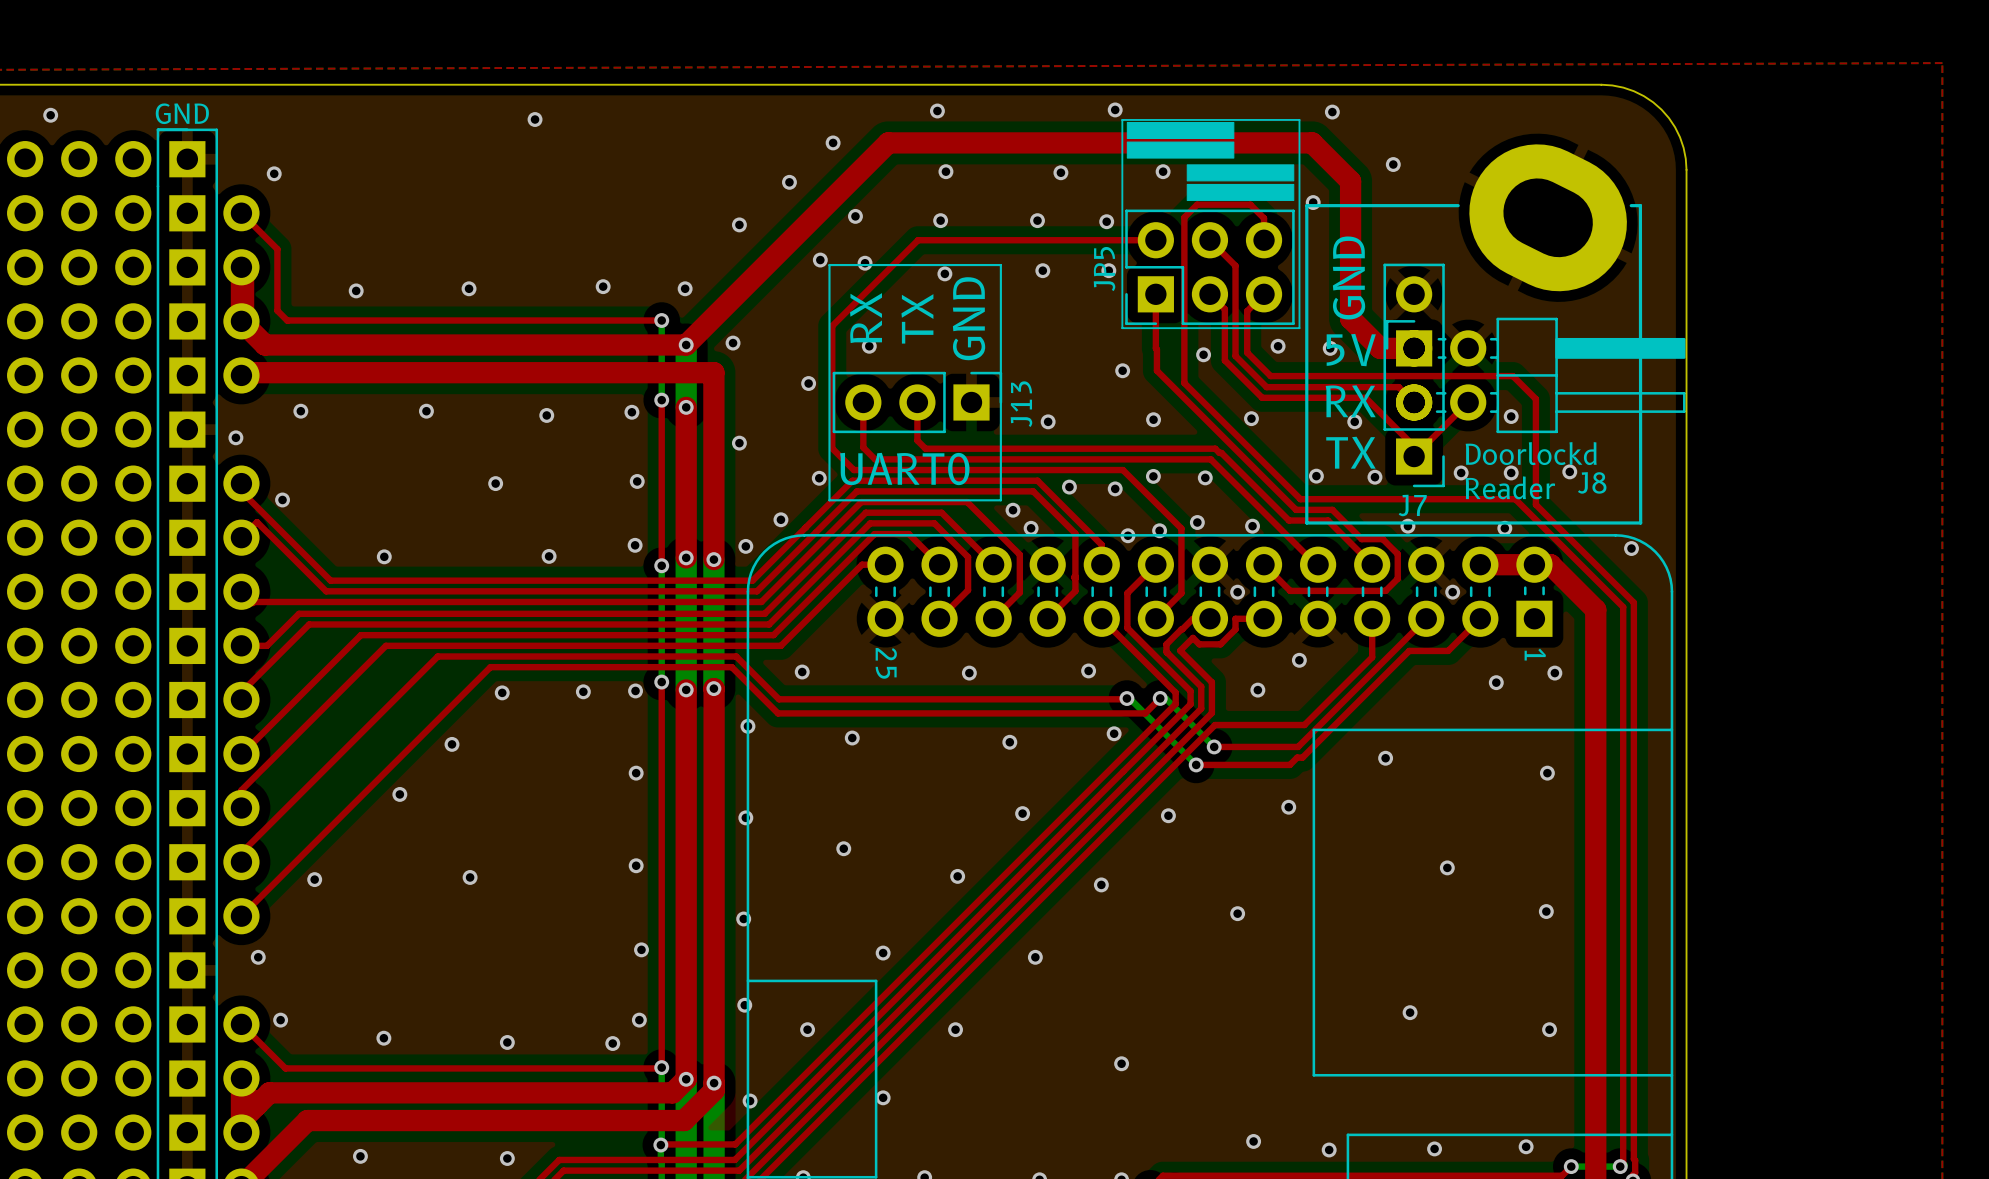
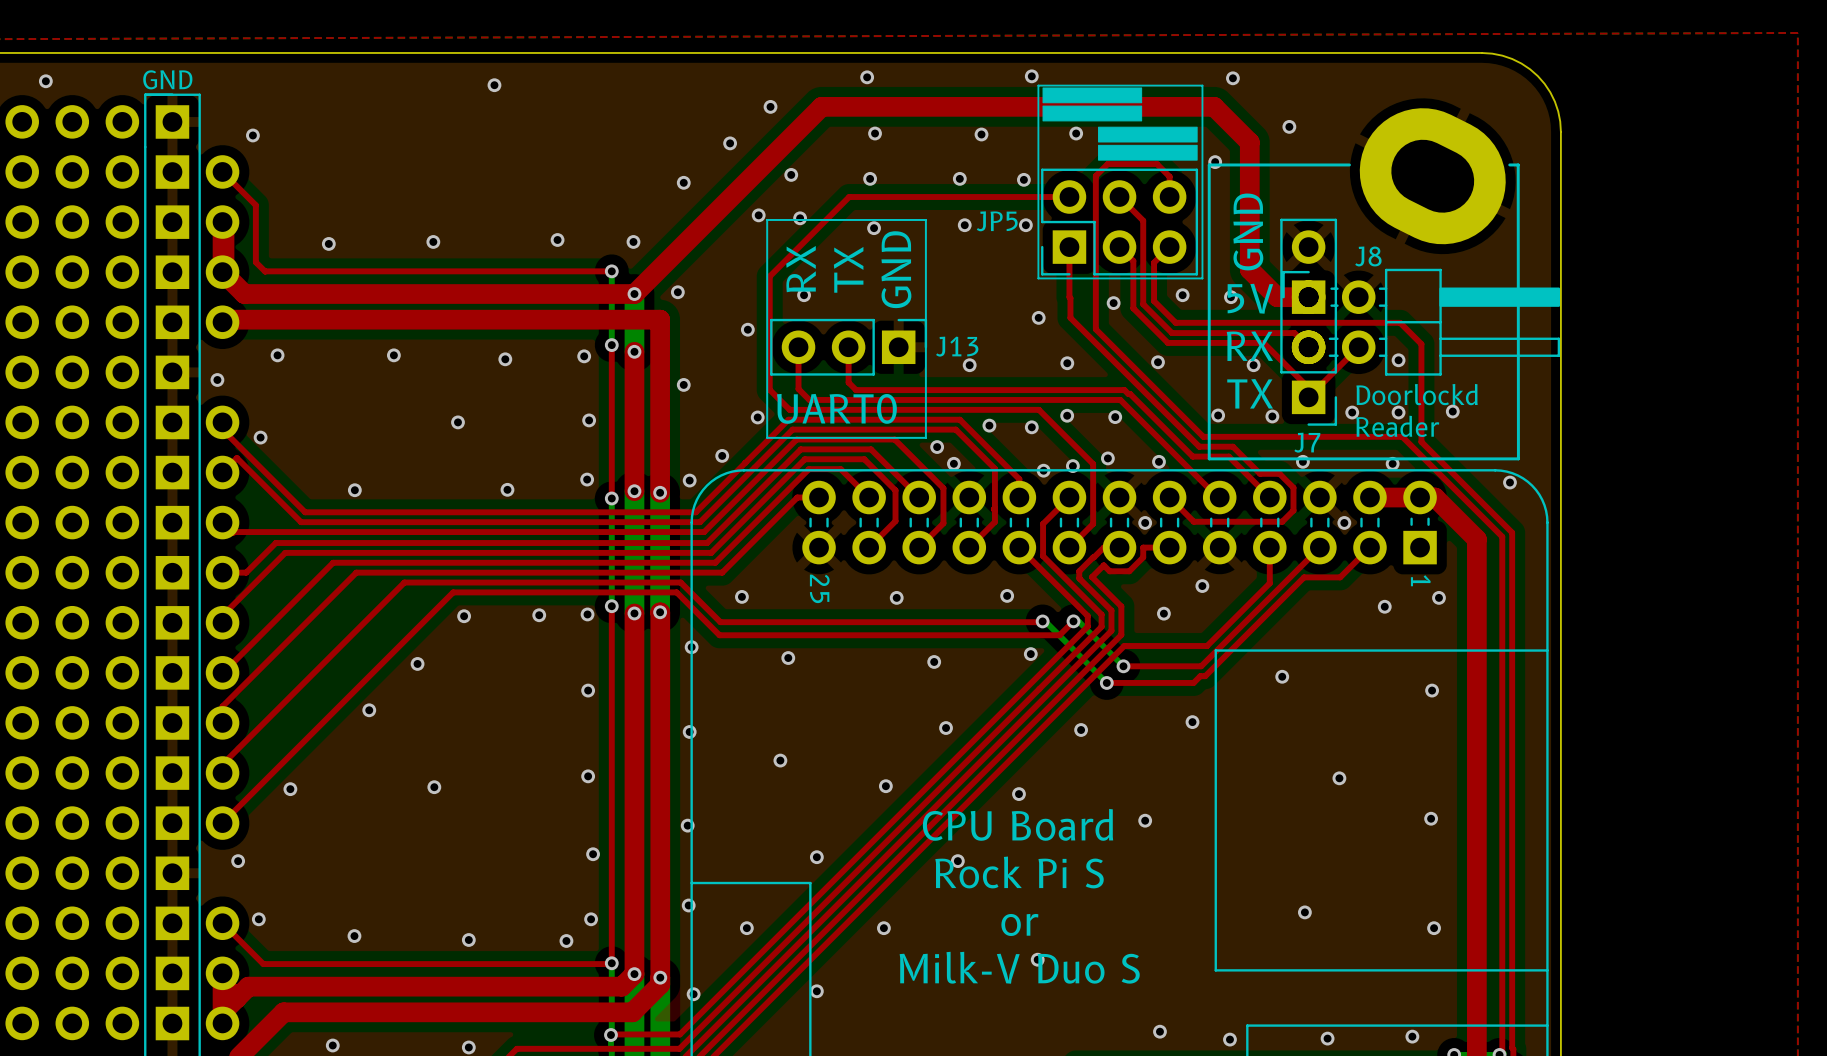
JP5 name rotation: 0° (1104, 269) -> 90° clockwise (997, 221)
J13 name rotation: 0° (1021, 404) -> 90° clockwise (957, 346)
J8 name position: J8 (1592, 482) -> J8 (1368, 256)
text: none -> CPU Board (1018, 824)
text: none -> Rock Pi S (1019, 872)
text: none -> or (1019, 924)
text: none -> Milk-V Duo S (1019, 967)

